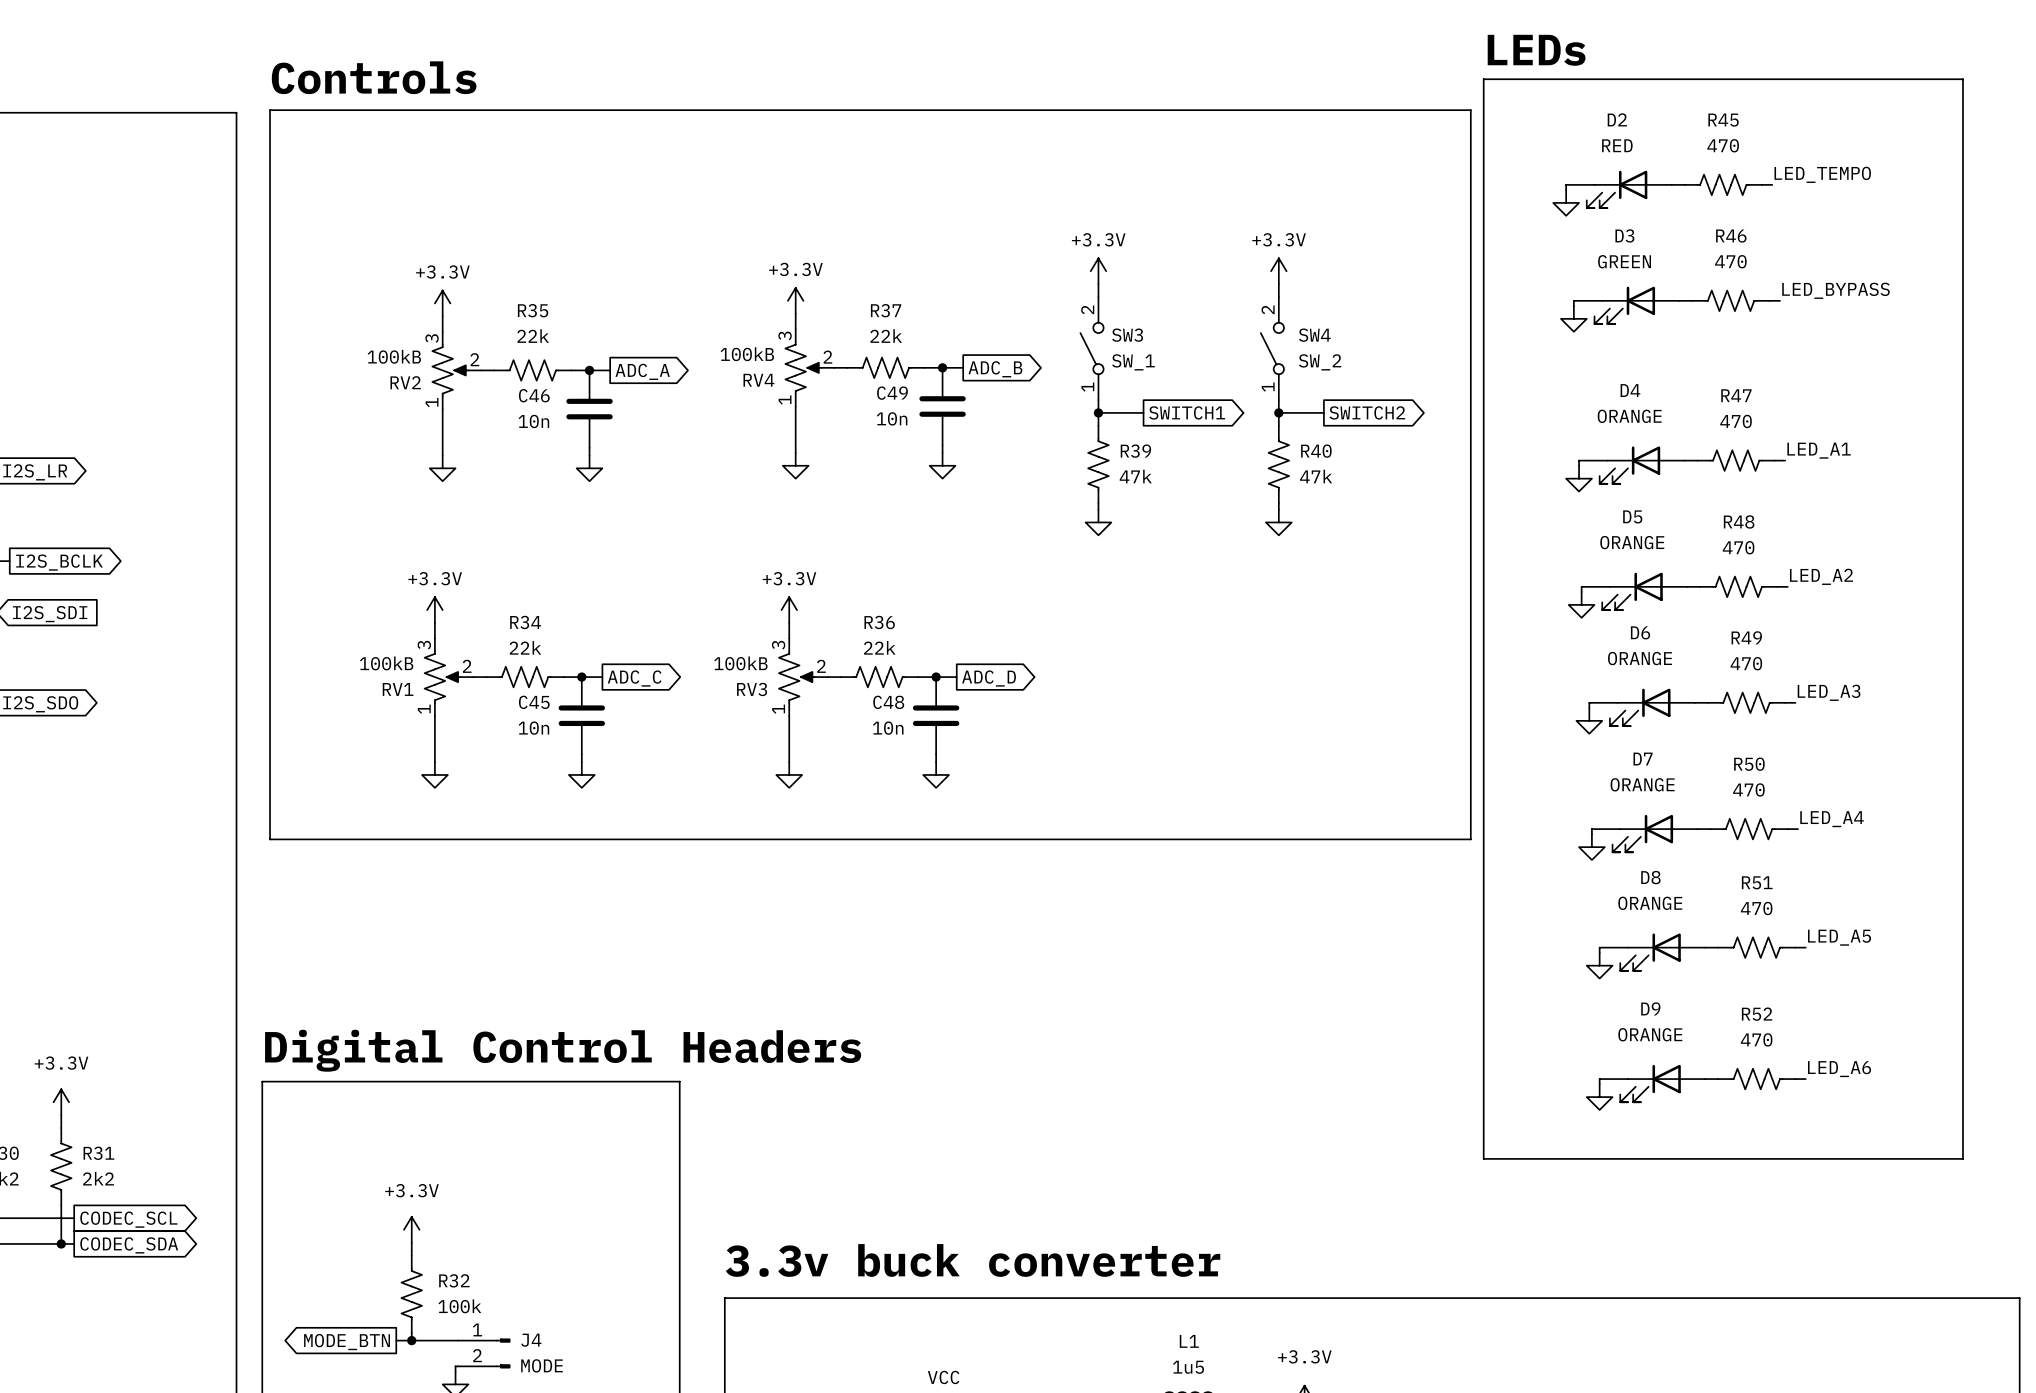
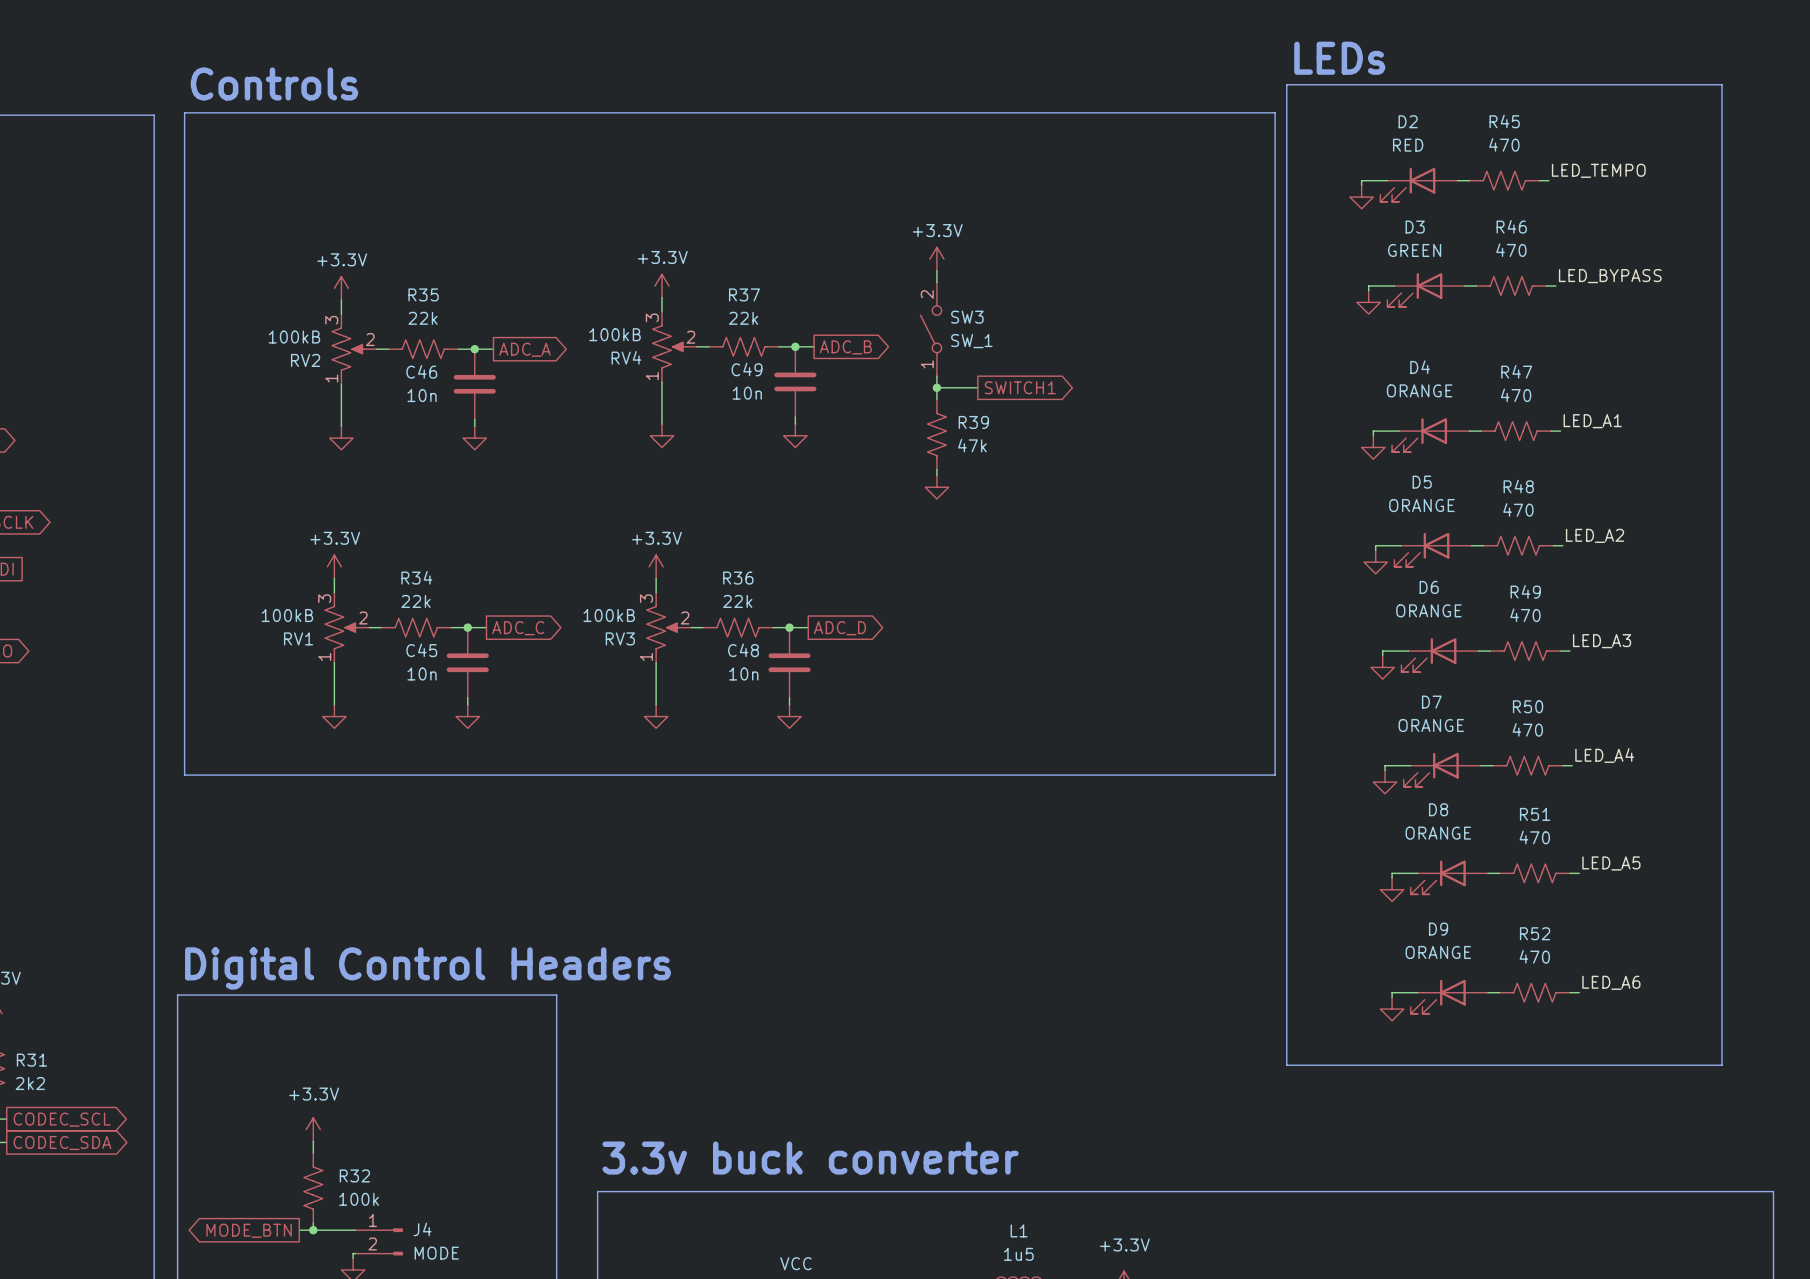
power symbol: +3.3V (1278, 271) -> none
wire: (1278, 284) (1278, 296) -> none
SW4: SW_2 (1272, 348) -> none
wire: (1278, 400) (1278, 425) -> none
wire: (1278, 412) (1323, 412) -> none
junction: (1278, 412) -> none
global label: SWITCH2 (1367, 412) -> none
R40: 47k (1278, 464) -> none
wire: (1278, 503) (1278, 509) -> none
power symbol: (1278, 522) -> none

